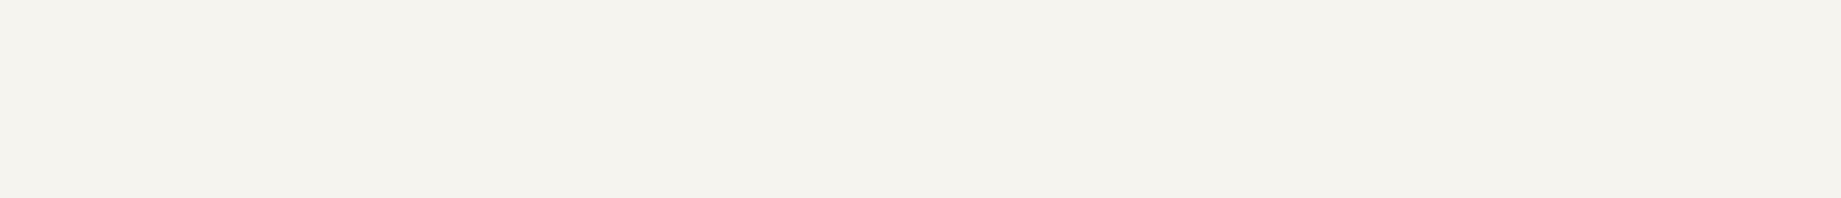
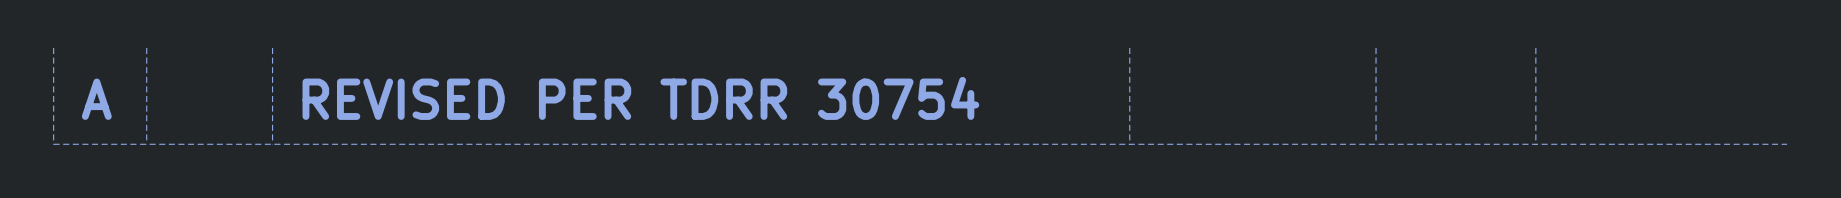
line: none -> (53, 48) (53, 144) (1787, 144)
line: none -> (146, 48) (146, 144)
line: none -> (272, 48) (272, 144)
line: none -> (1129, 48) (1129, 144)
line: none -> (1376, 48) (1376, 144)
line: none -> (1535, 48) (1535, 144)
text: none -> A (96, 99)
text: none -> REVISED PER TDRR 30754 (640, 98)

